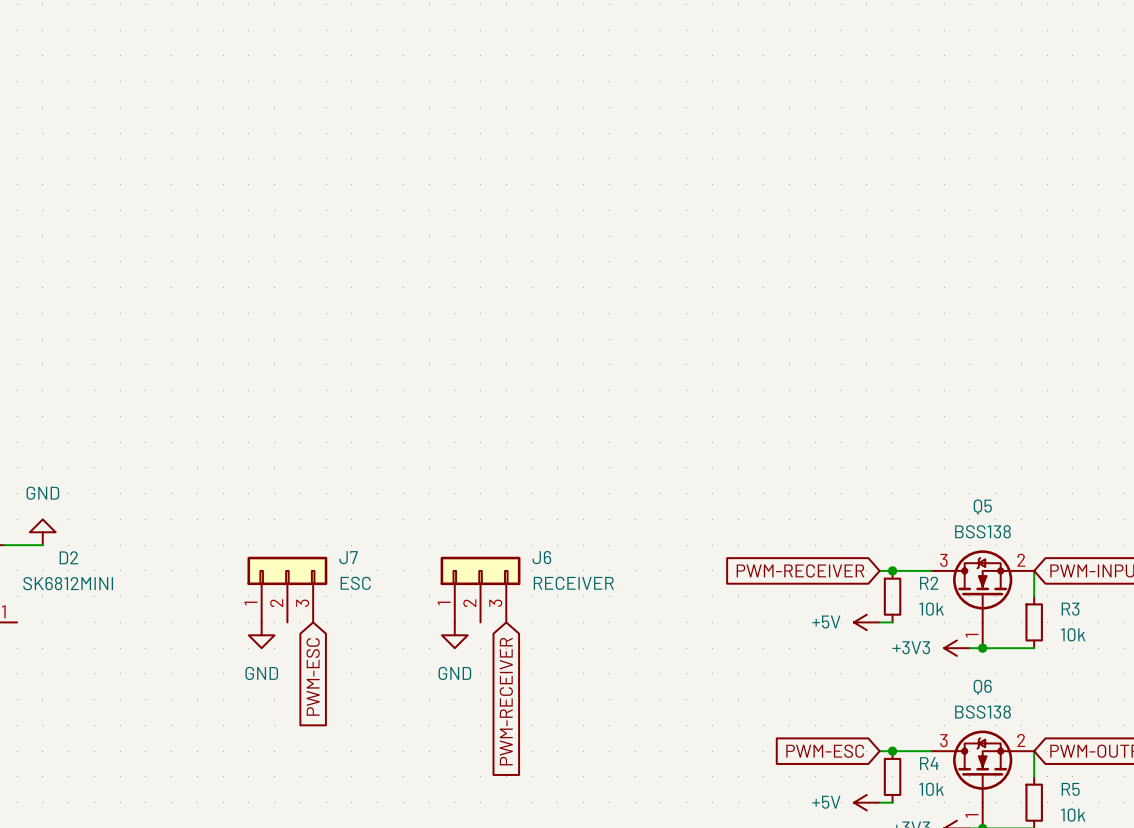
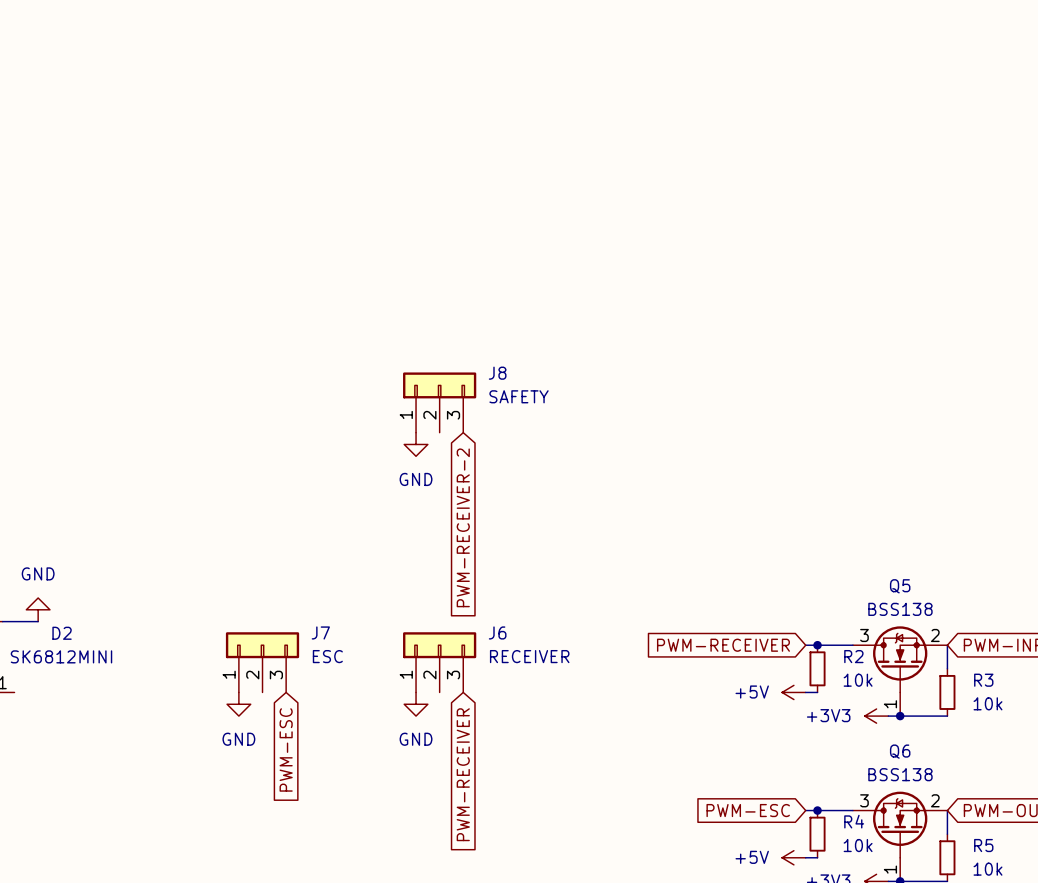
J8: none -> SAFETY (439, 402)
power symbol: none -> GND (416, 444)
global label: none -> PWM-RECEIVER-2 (463, 527)

